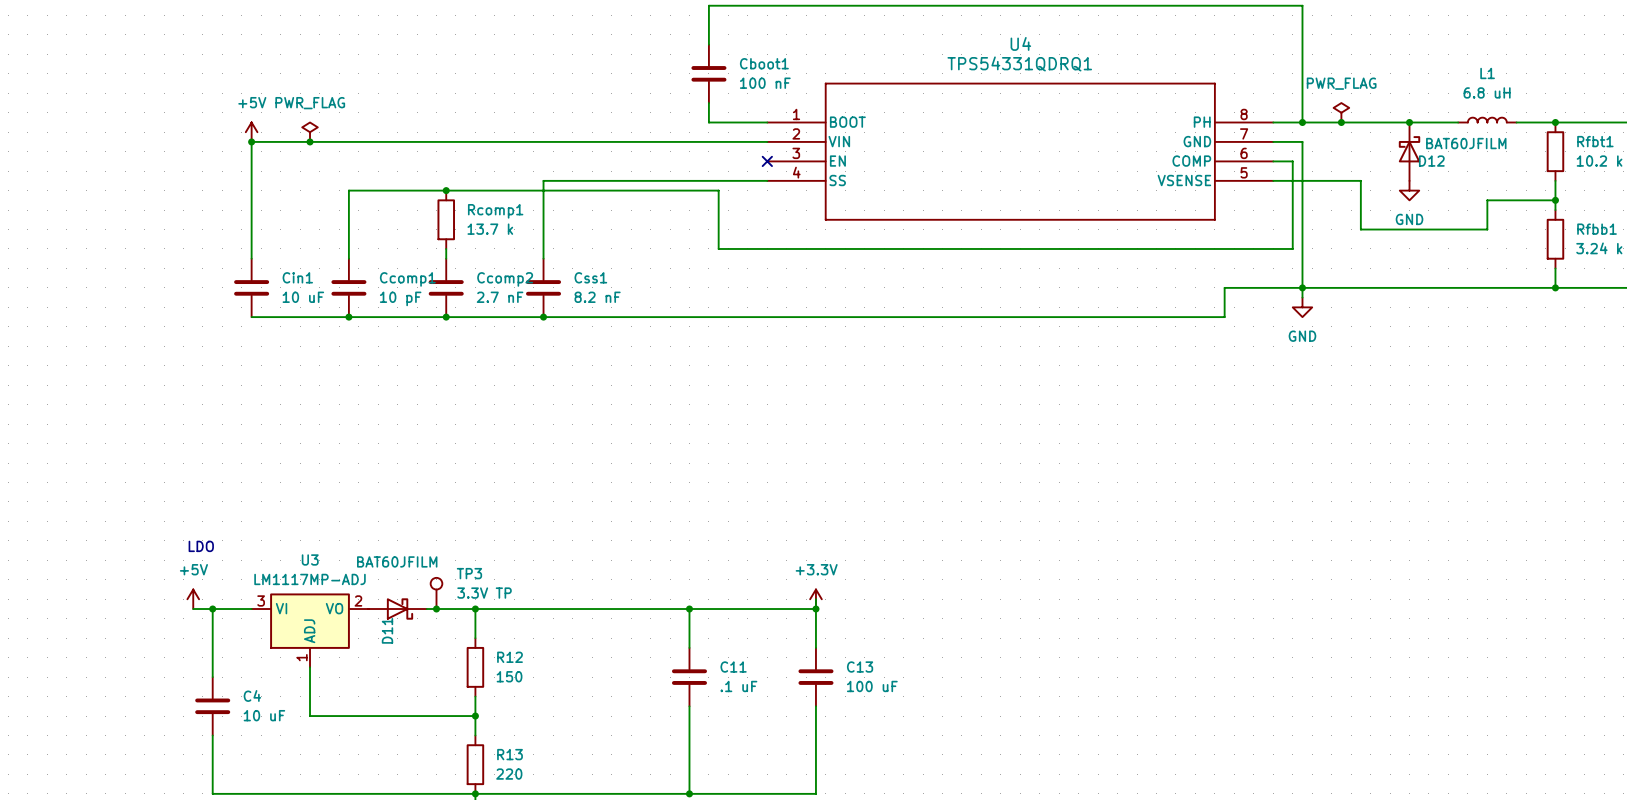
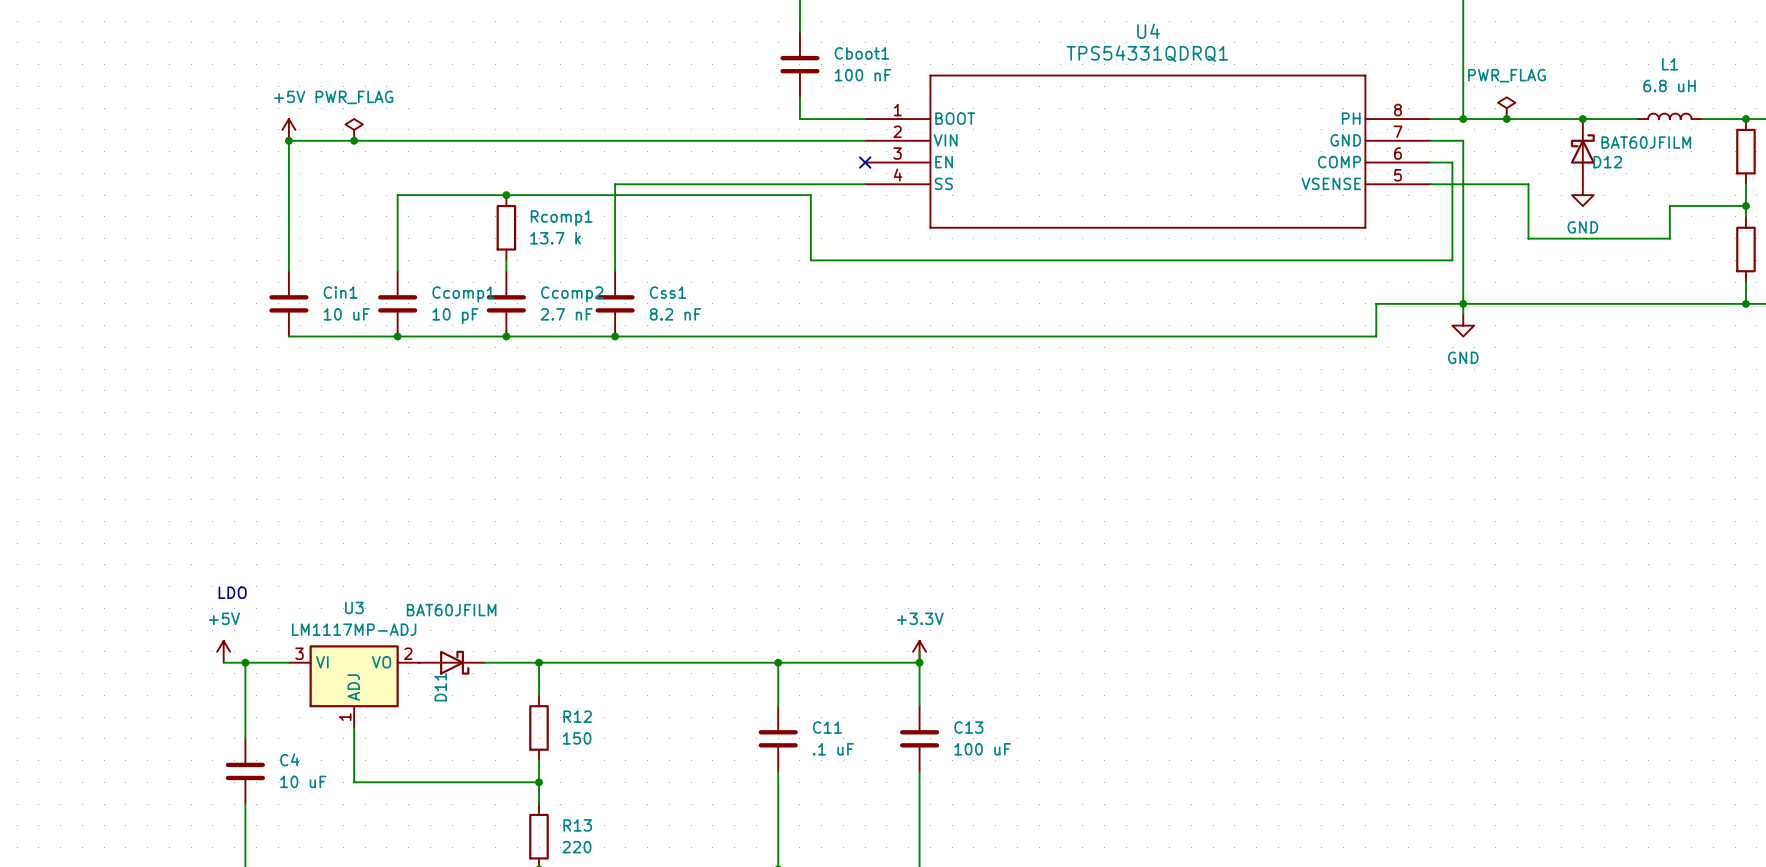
TP3: 3.3V TP (436, 593) -> none
junction: (436, 609) -> none

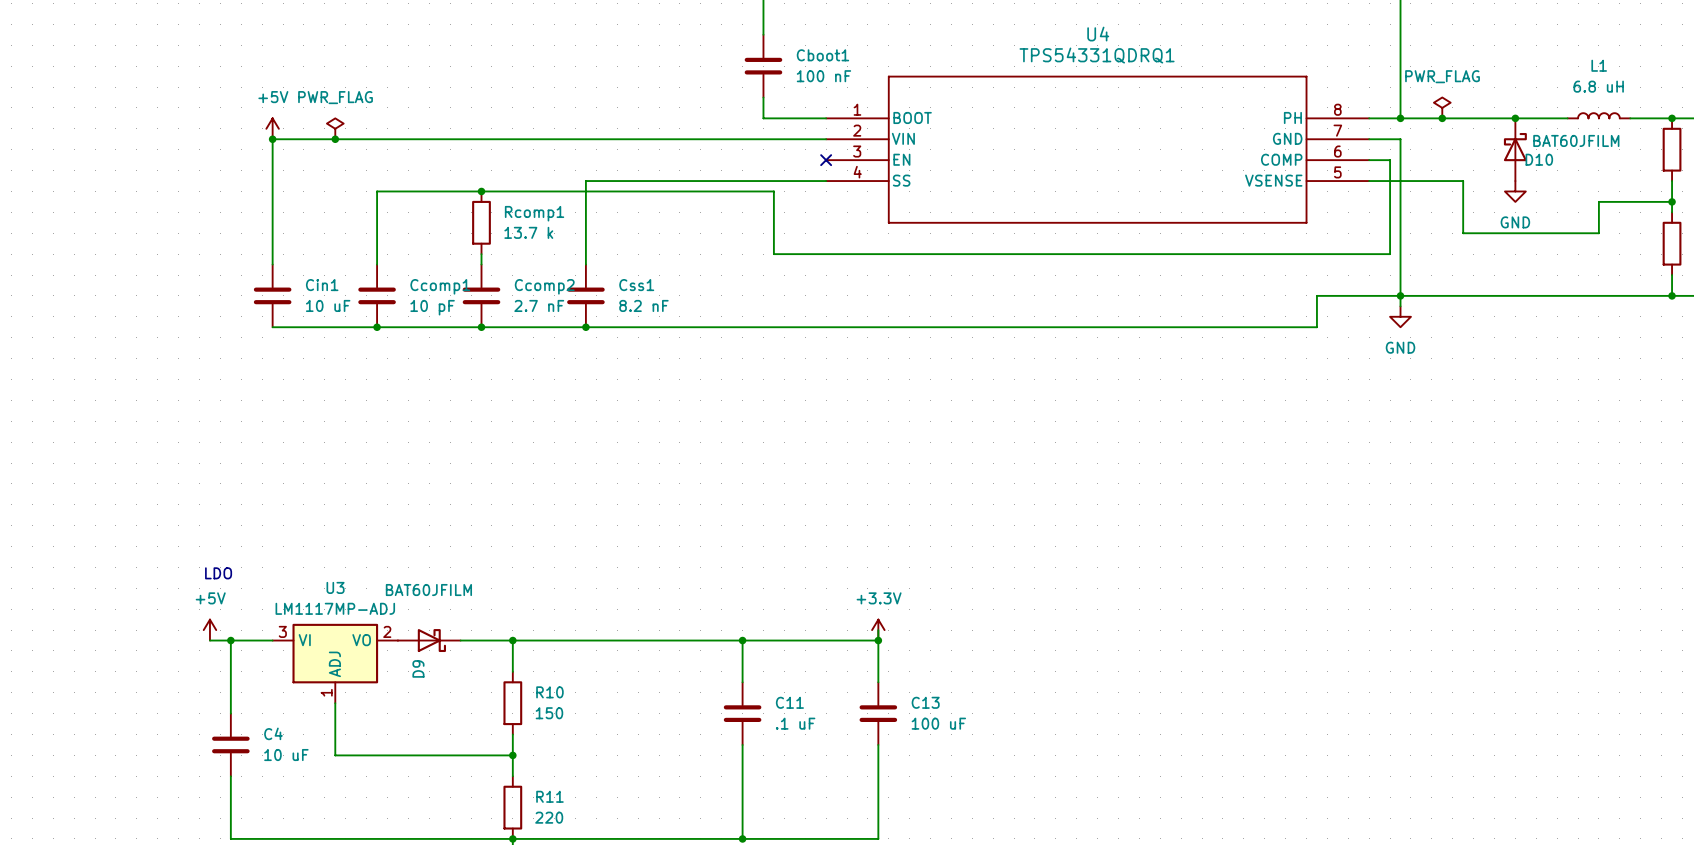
D12 name: D12 (1607, 162) -> D10 (1539, 159)
D11 name: D11 (440, 687) -> D9 (418, 668)
R12 name: R12 (577, 716) -> R10 (549, 692)
R13 name: R13 (577, 825) -> R11 (549, 796)

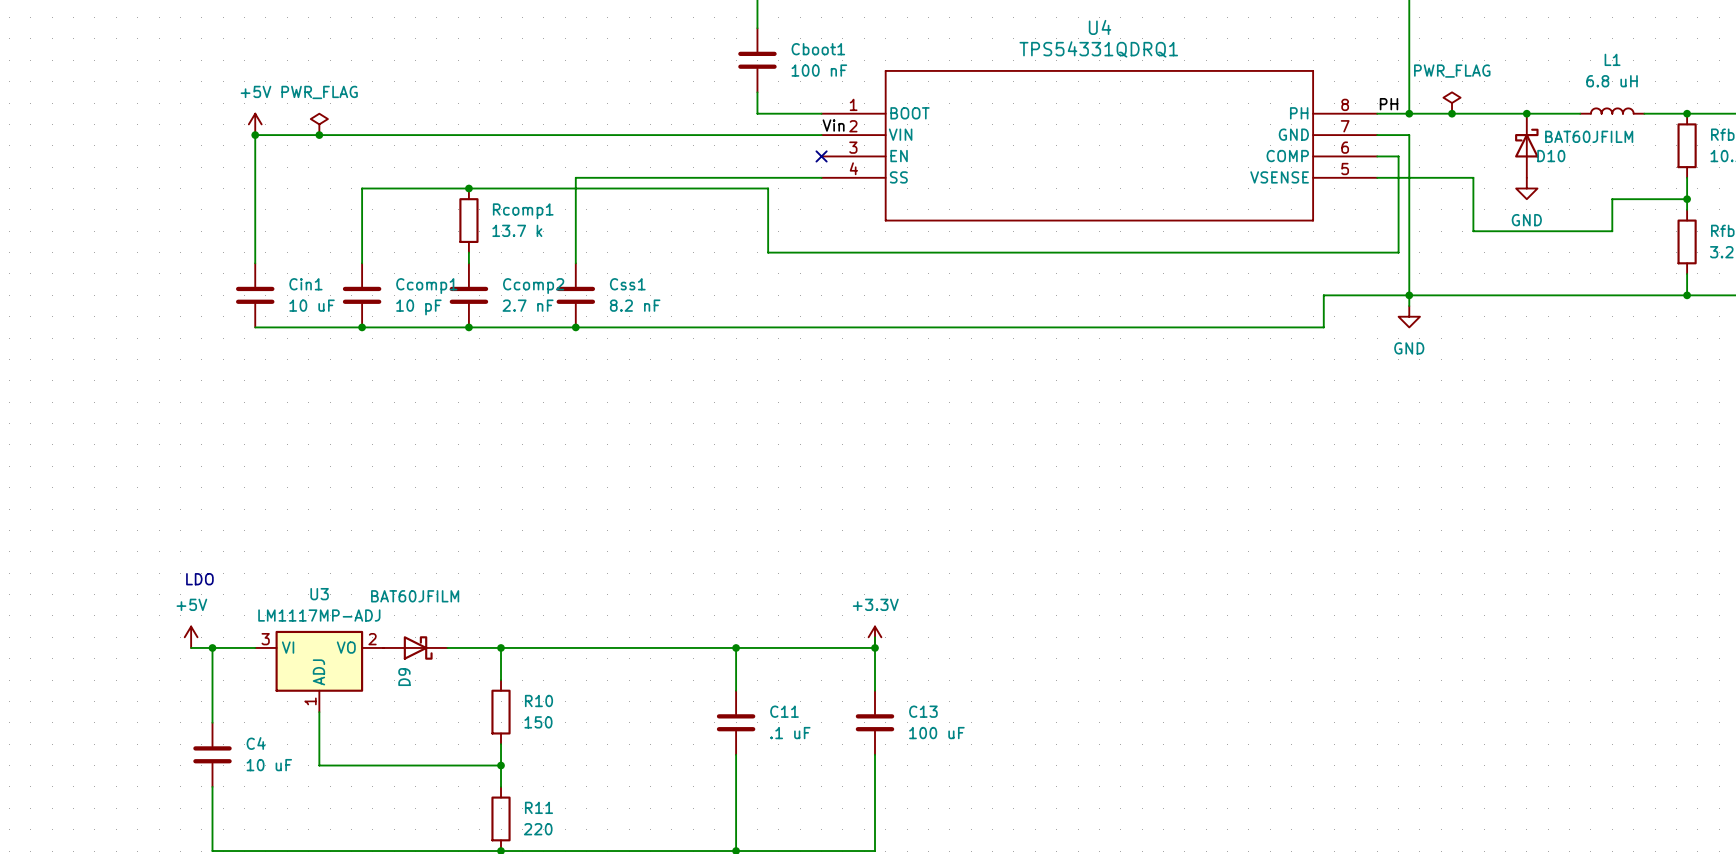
label: none -> PH (1389, 104)
label: none -> Vin (833, 125)

